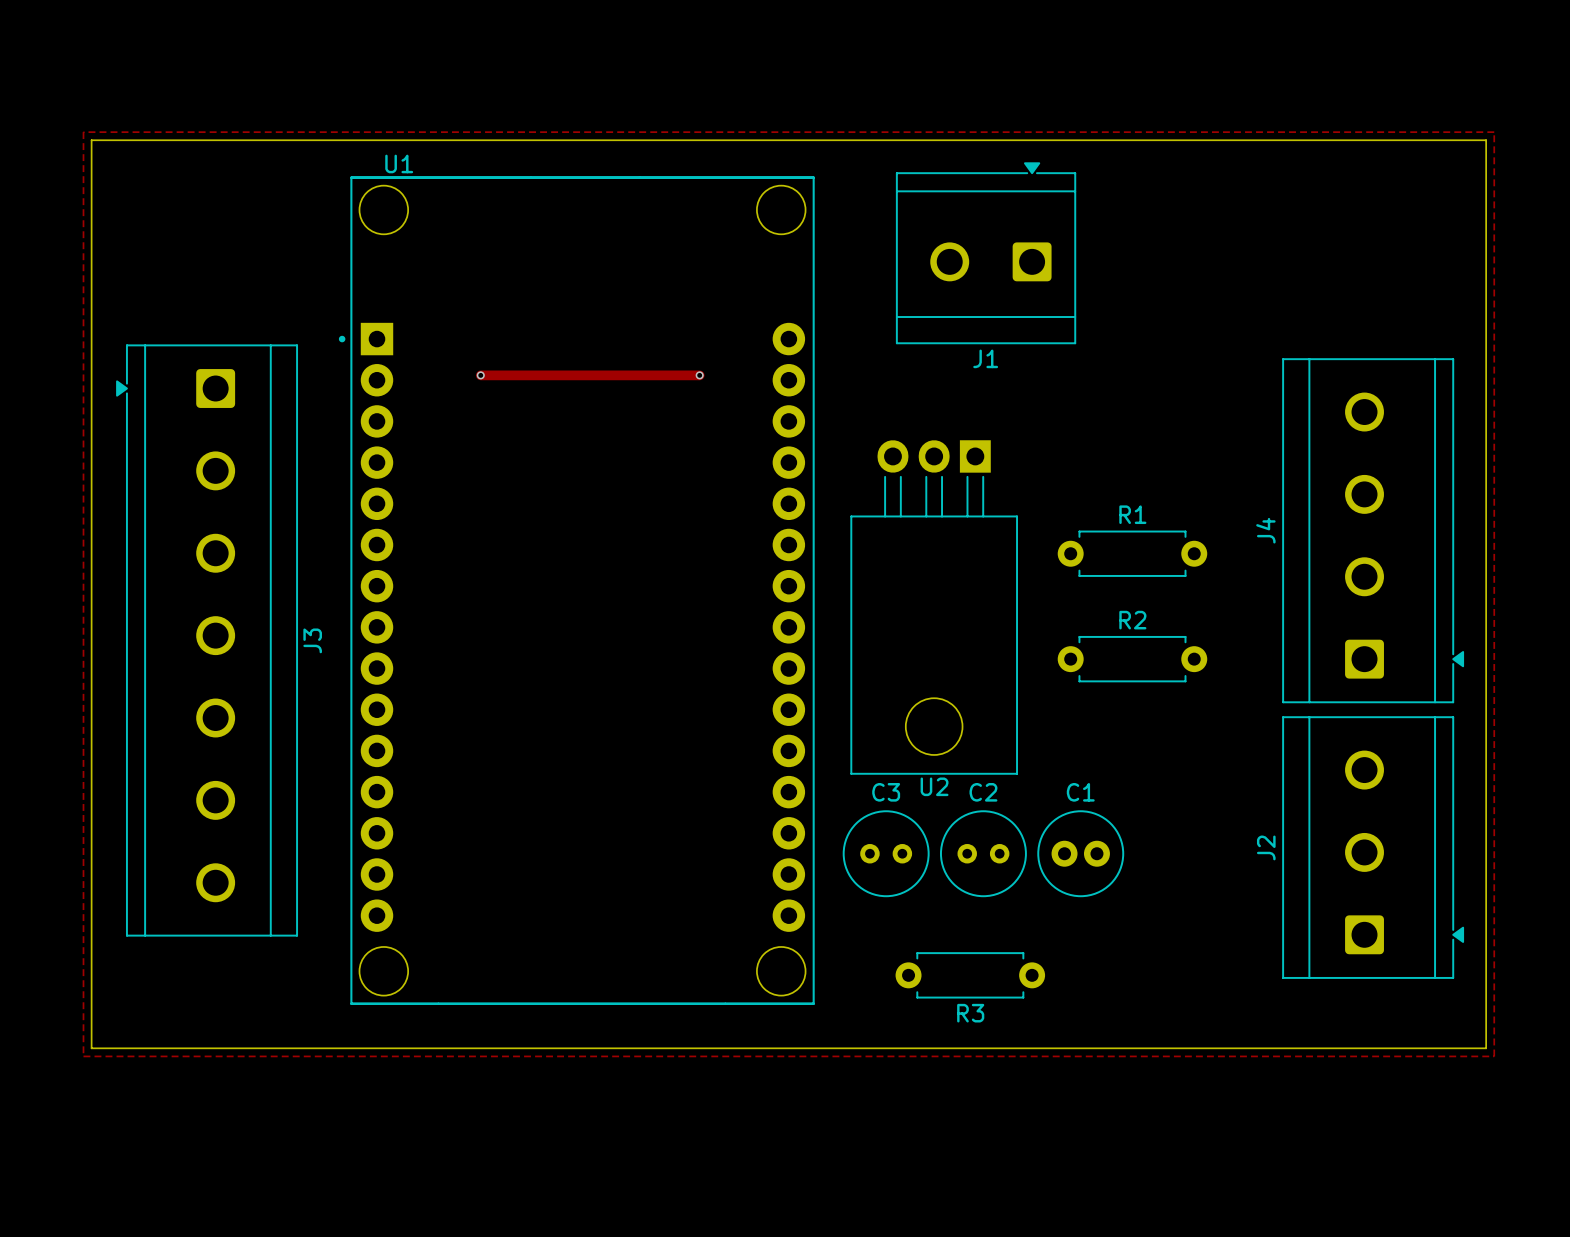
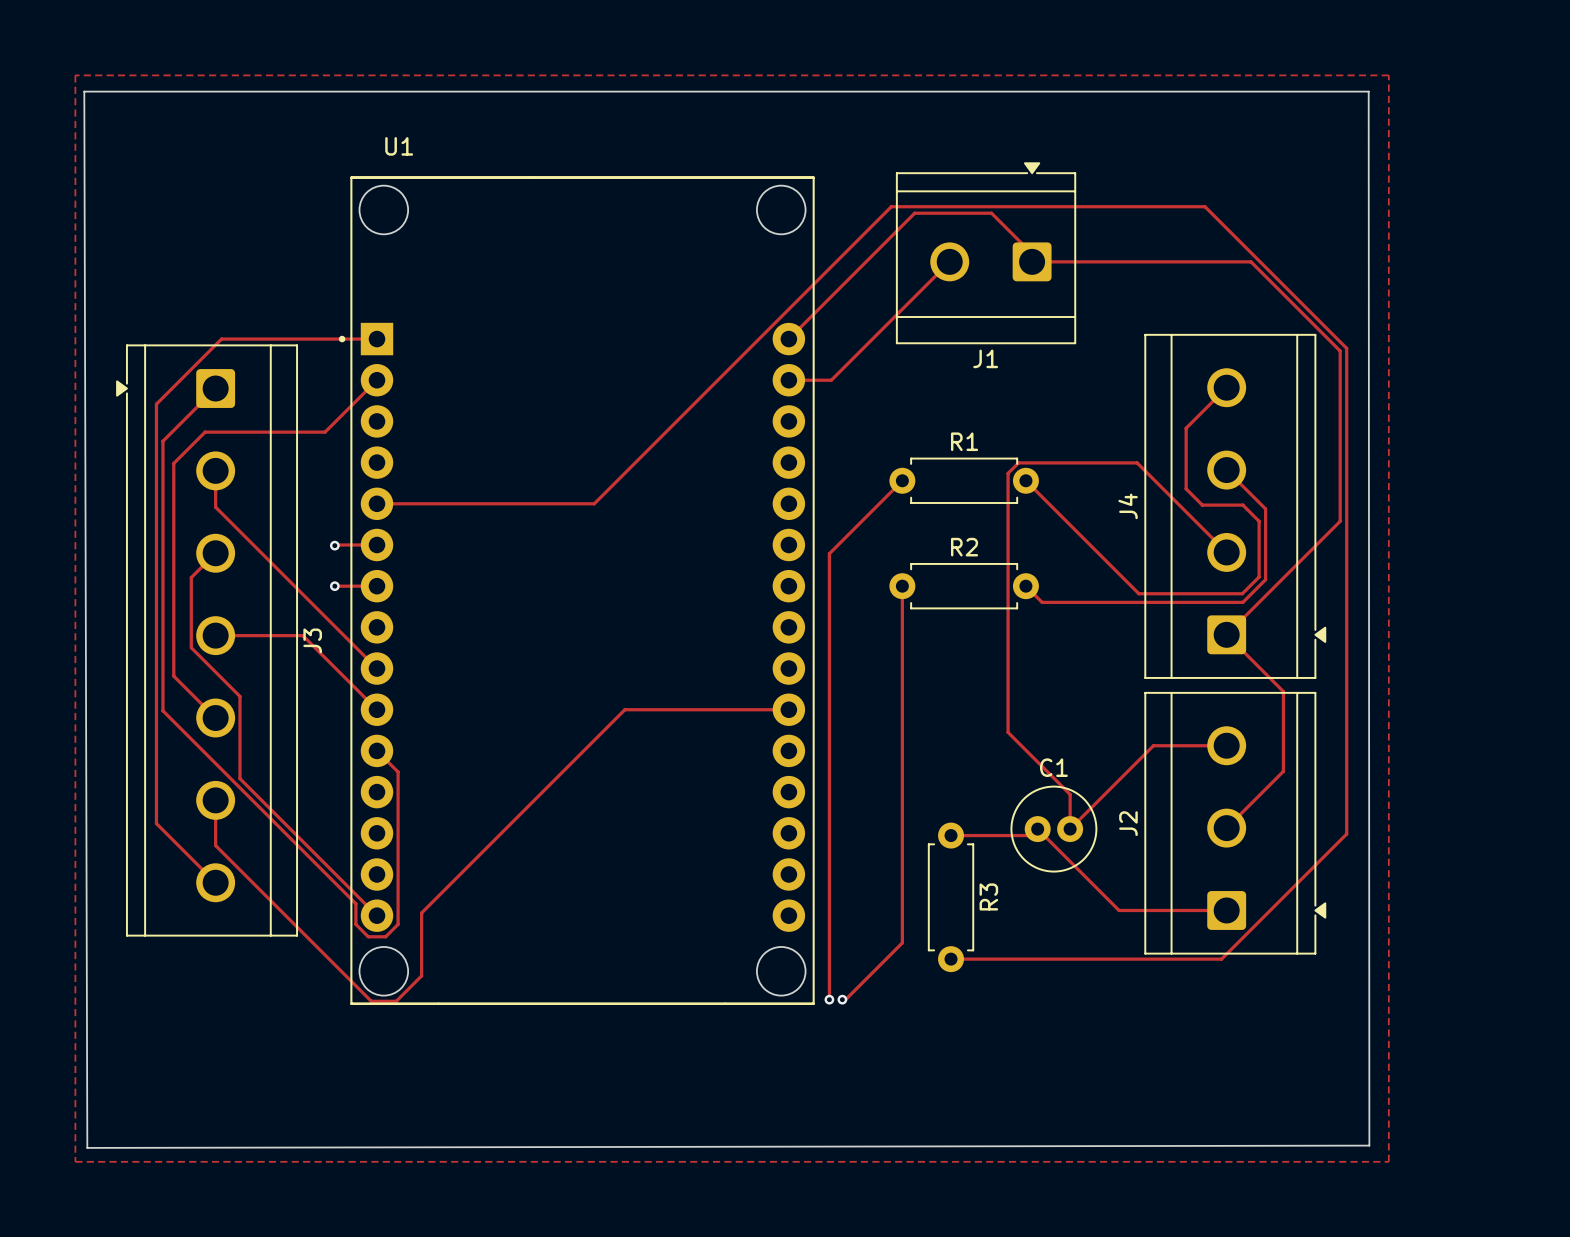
zone outline: (83, 132) (83, 1056) (1494, 1056) (1494, 132) (83, 132) -> (75, 75) (75, 1161) (1388, 1161) (1388, 75) (75, 75)
board edge: (91, 140) (1486, 140) (1486, 1048) (91, 1048) (91, 140) -> (84, 91) (87, 1147) (1369, 1145) (1368, 91) (84, 91)
U1 name position: U1 (399, 163) -> U1 (399, 146)
track: none -> (949, 275) (949, 261) (831, 380) (788, 380)
track: none -> (376, 339) (221, 339) (156, 404) (156, 823) (215, 882)
track: none -> (788, 339) (914, 213) (991, 213) (1032, 253) (1032, 261) (1251, 261) (1340, 351) (1340, 521) (1226, 634) (1283, 691) (1283, 771) (1226, 828)
track: (480, 375) (699, 375) -> none
via: (480, 375) -> none
via: (699, 375) -> none
track: none -> (376, 380) (325, 432) (205, 432) (173, 463) (173, 676) (215, 718)
track: none -> (1226, 387) (1186, 428) (1186, 488) (1202, 505) (1242, 505) (1259, 521) (1259, 576) (1242, 593) (1138, 593) (1025, 480)
track: none -> (215, 388) (162, 441) (162, 710) (355, 903) (355, 924) (368, 936) (385, 936) (398, 924) (398, 772) (376, 750)
track: none -> (215, 470) (215, 507) (376, 668)
track: none -> (1226, 470) (1265, 509) (1265, 579) (1242, 602) (1042, 602) (1025, 586)
track: none -> (902, 480) (829, 553) (829, 999)
track: none -> (376, 503) (594, 503) (891, 206) (1205, 206) (1346, 348) (1346, 834) (1221, 959) (951, 959)
J4 position: (1373, 530) -> (1235, 506)
track: none -> (376, 544) (334, 545)
via: none -> (334, 545)
track: none -> (1226, 552) (1137, 462) (1018, 462) (1008, 473) (1008, 732) (1070, 794) (1070, 829) (1153, 745) (1226, 745)
track: none -> (215, 553) (191, 577) (191, 647) (239, 696) (239, 778) (376, 915) (376, 905)
R1 position: (1132, 553) -> (964, 480)
track: none -> (334, 586) (376, 586)
via: none -> (334, 586)
track: none -> (902, 586) (902, 942) (845, 999) (842, 999)
U2: (934, 607) -> none
track: none -> (215, 635) (302, 635) (376, 709)
R2 position: (1132, 659) -> (964, 586)
track: none -> (788, 709) (624, 709) (421, 913) (421, 975) (396, 1001) (371, 1001) (215, 845) (215, 800)
track: none -> (951, 835) (1031, 835) (1037, 829) (1119, 910) (1226, 910)
J2 position: (1373, 847) -> (1235, 823)
C3: (886, 853) -> none
C2: (983, 853) -> none
C1 position: (1080, 853) -> (1053, 829)
R3 rotation: 0° (970, 975) -> 90° clockwise (951, 897)
via: none -> (829, 999)
via: none -> (842, 999)
R3 name position: R3 (970, 1013) -> R3 (988, 896)

